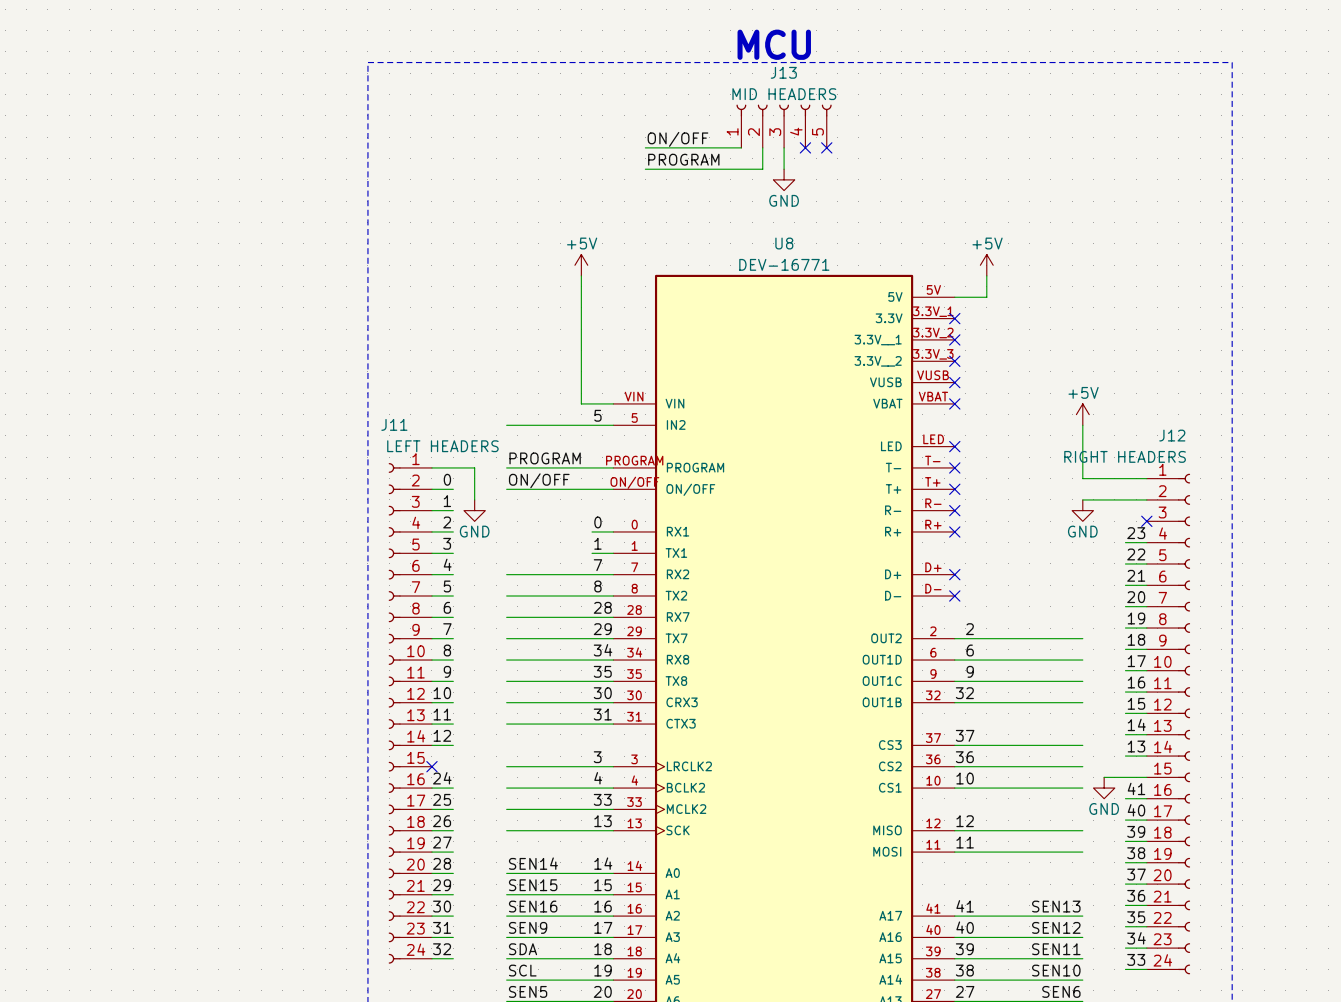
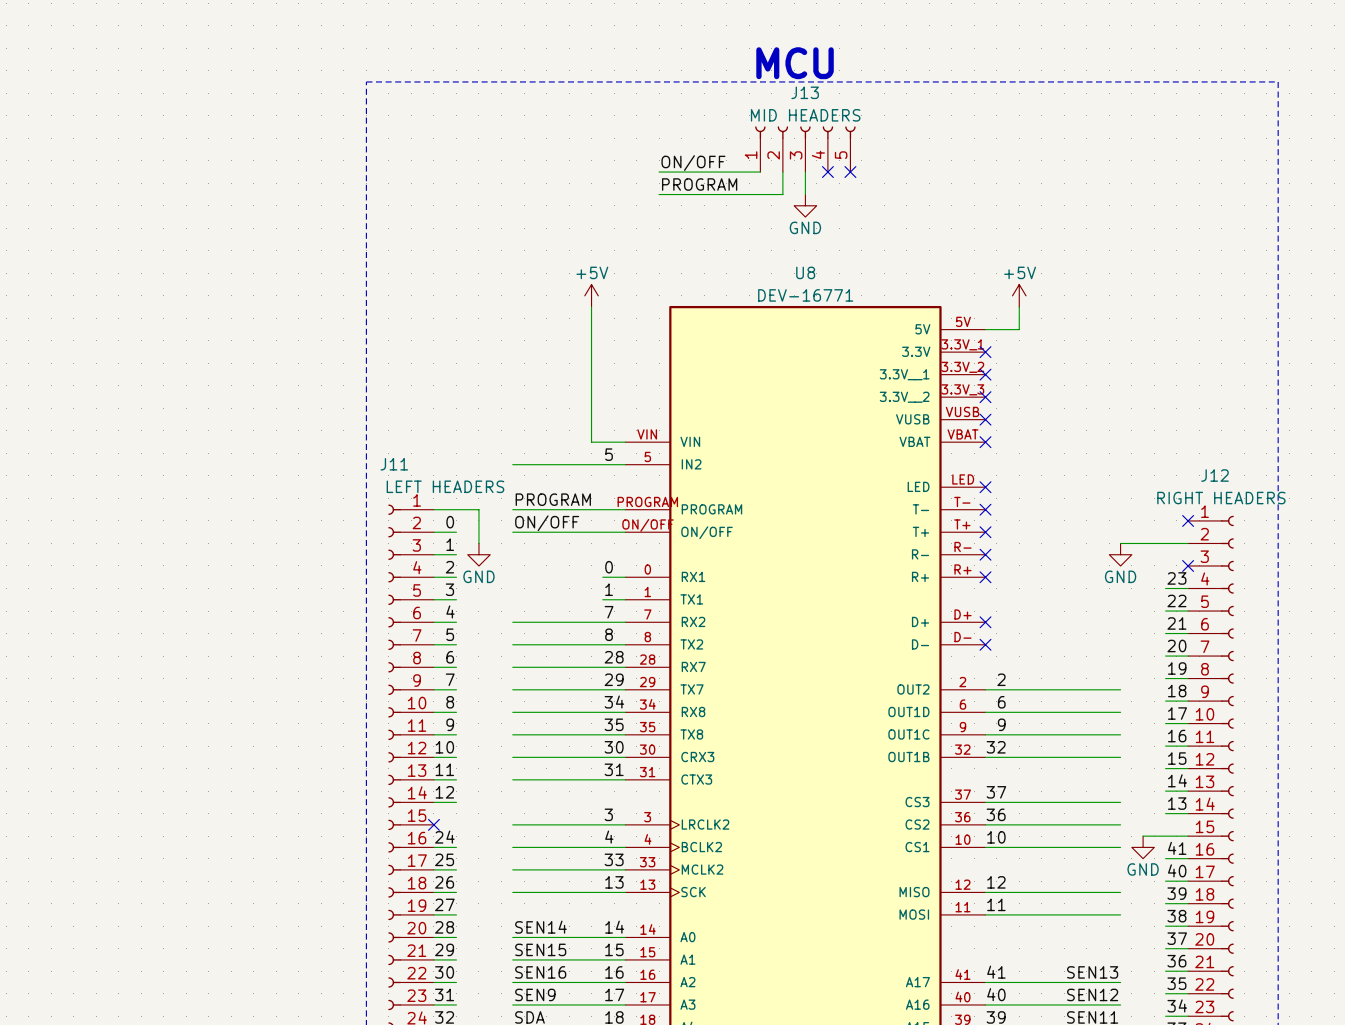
power symbol: +5V (1082, 414) -> none
wire: (1082, 425) (1082, 478) (1146, 478) -> none
J12 value position: RIGHT HEADERS (1125, 456) -> RIGHT HEADERS (1221, 498)
no-connect mark: none -> (1188, 520)

